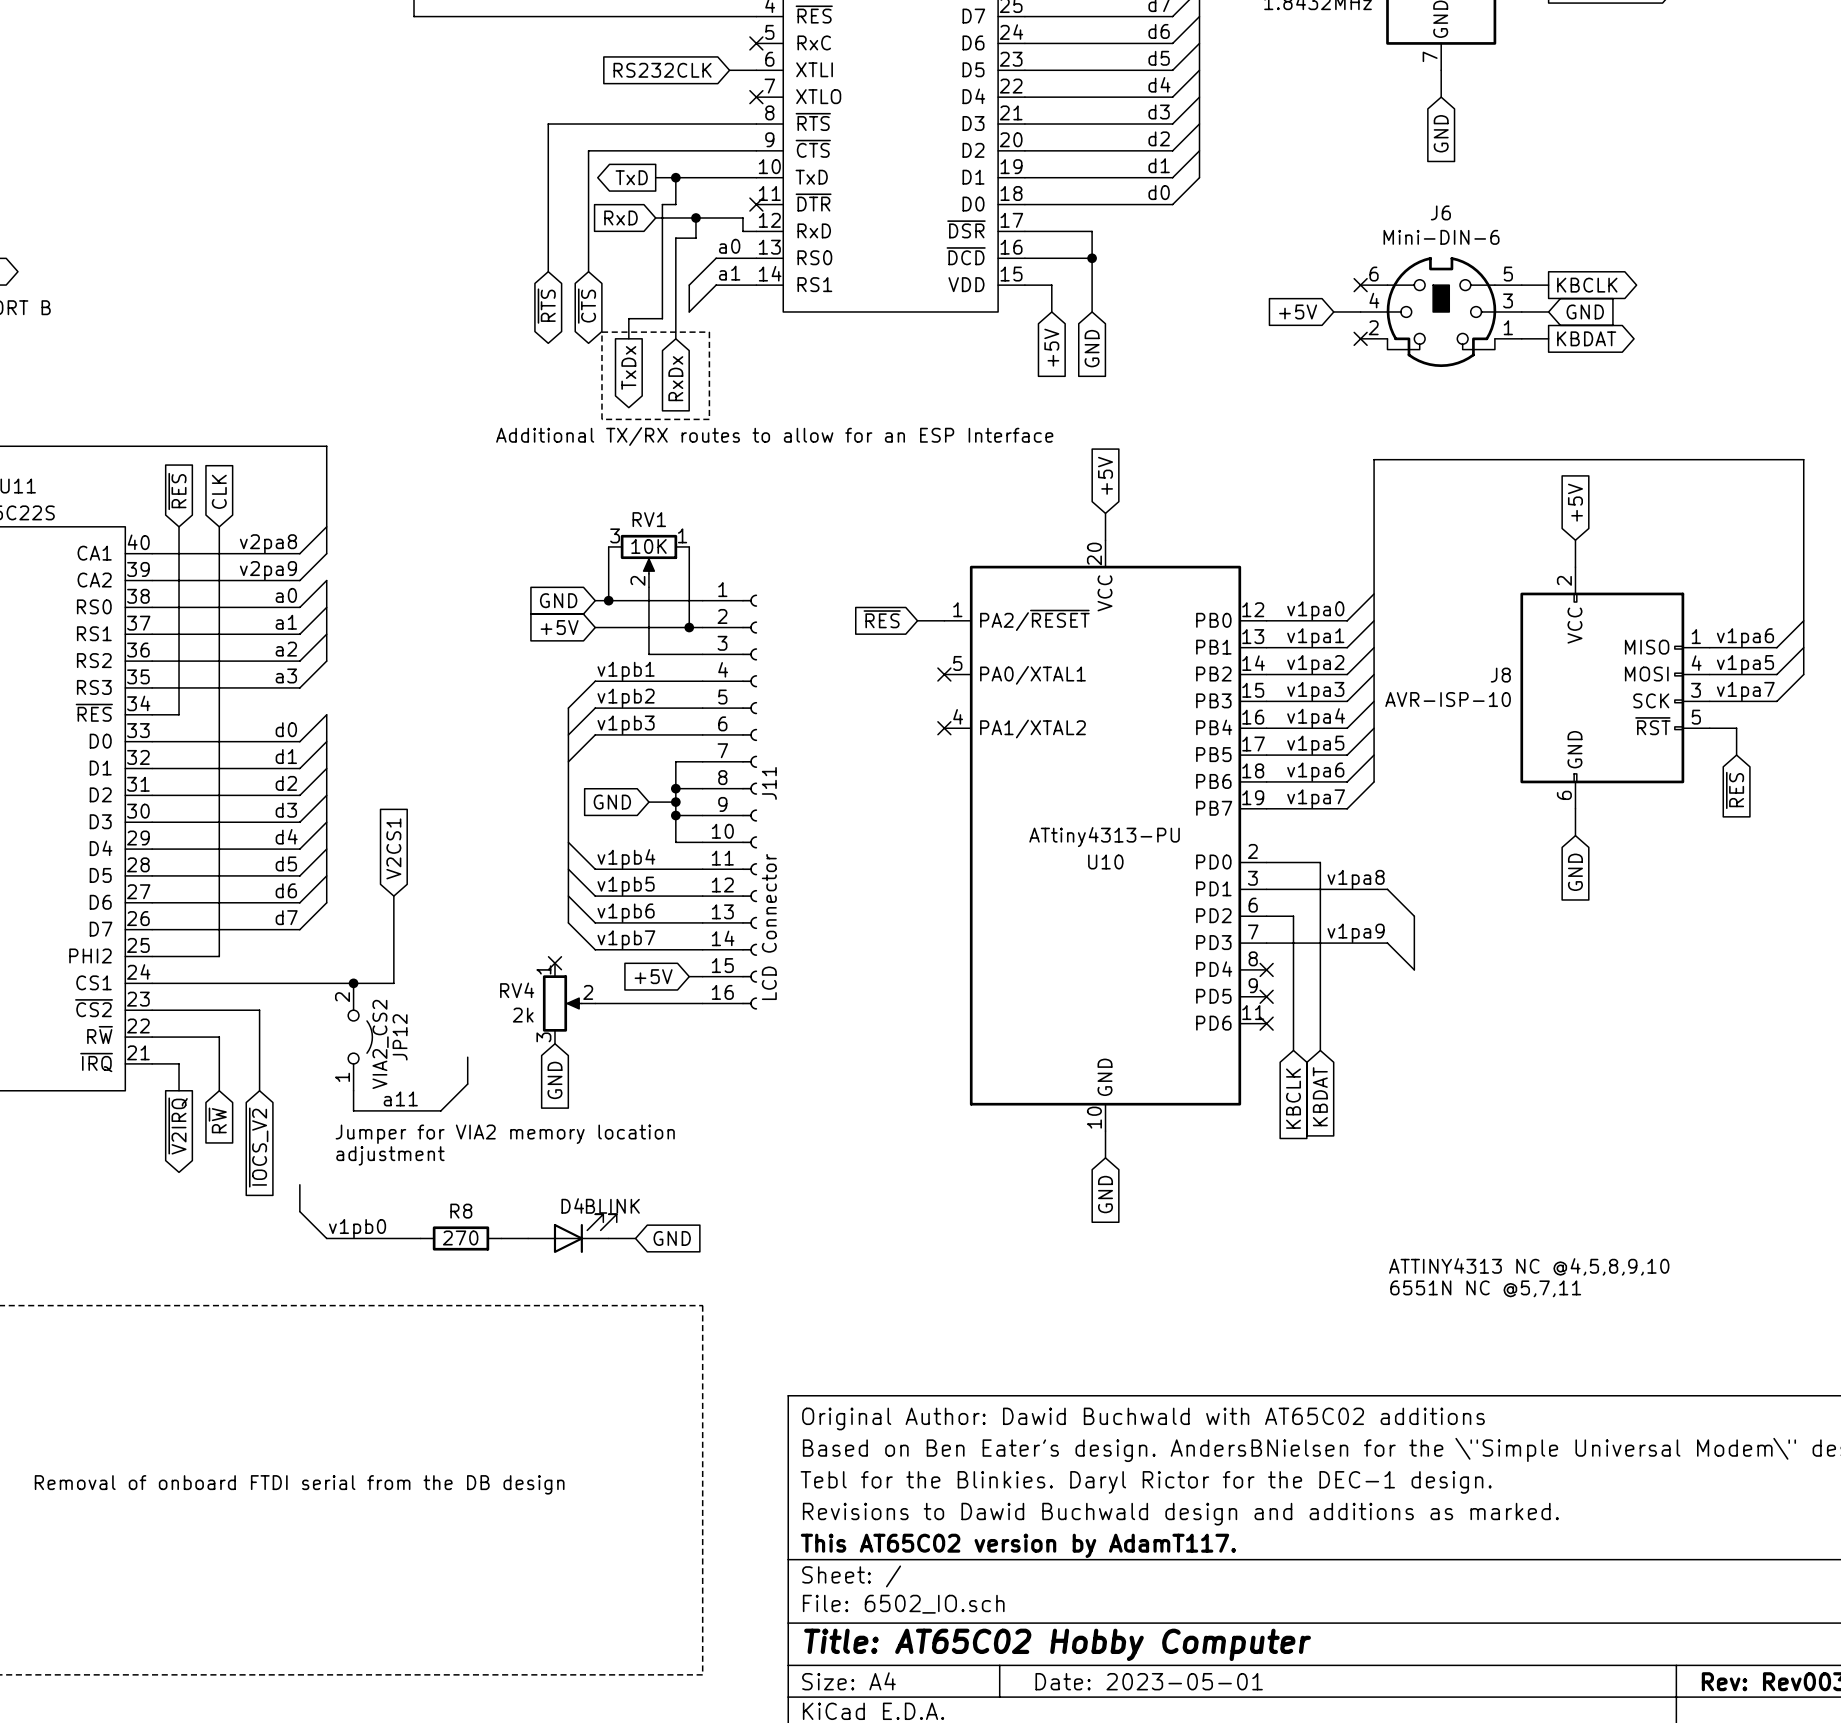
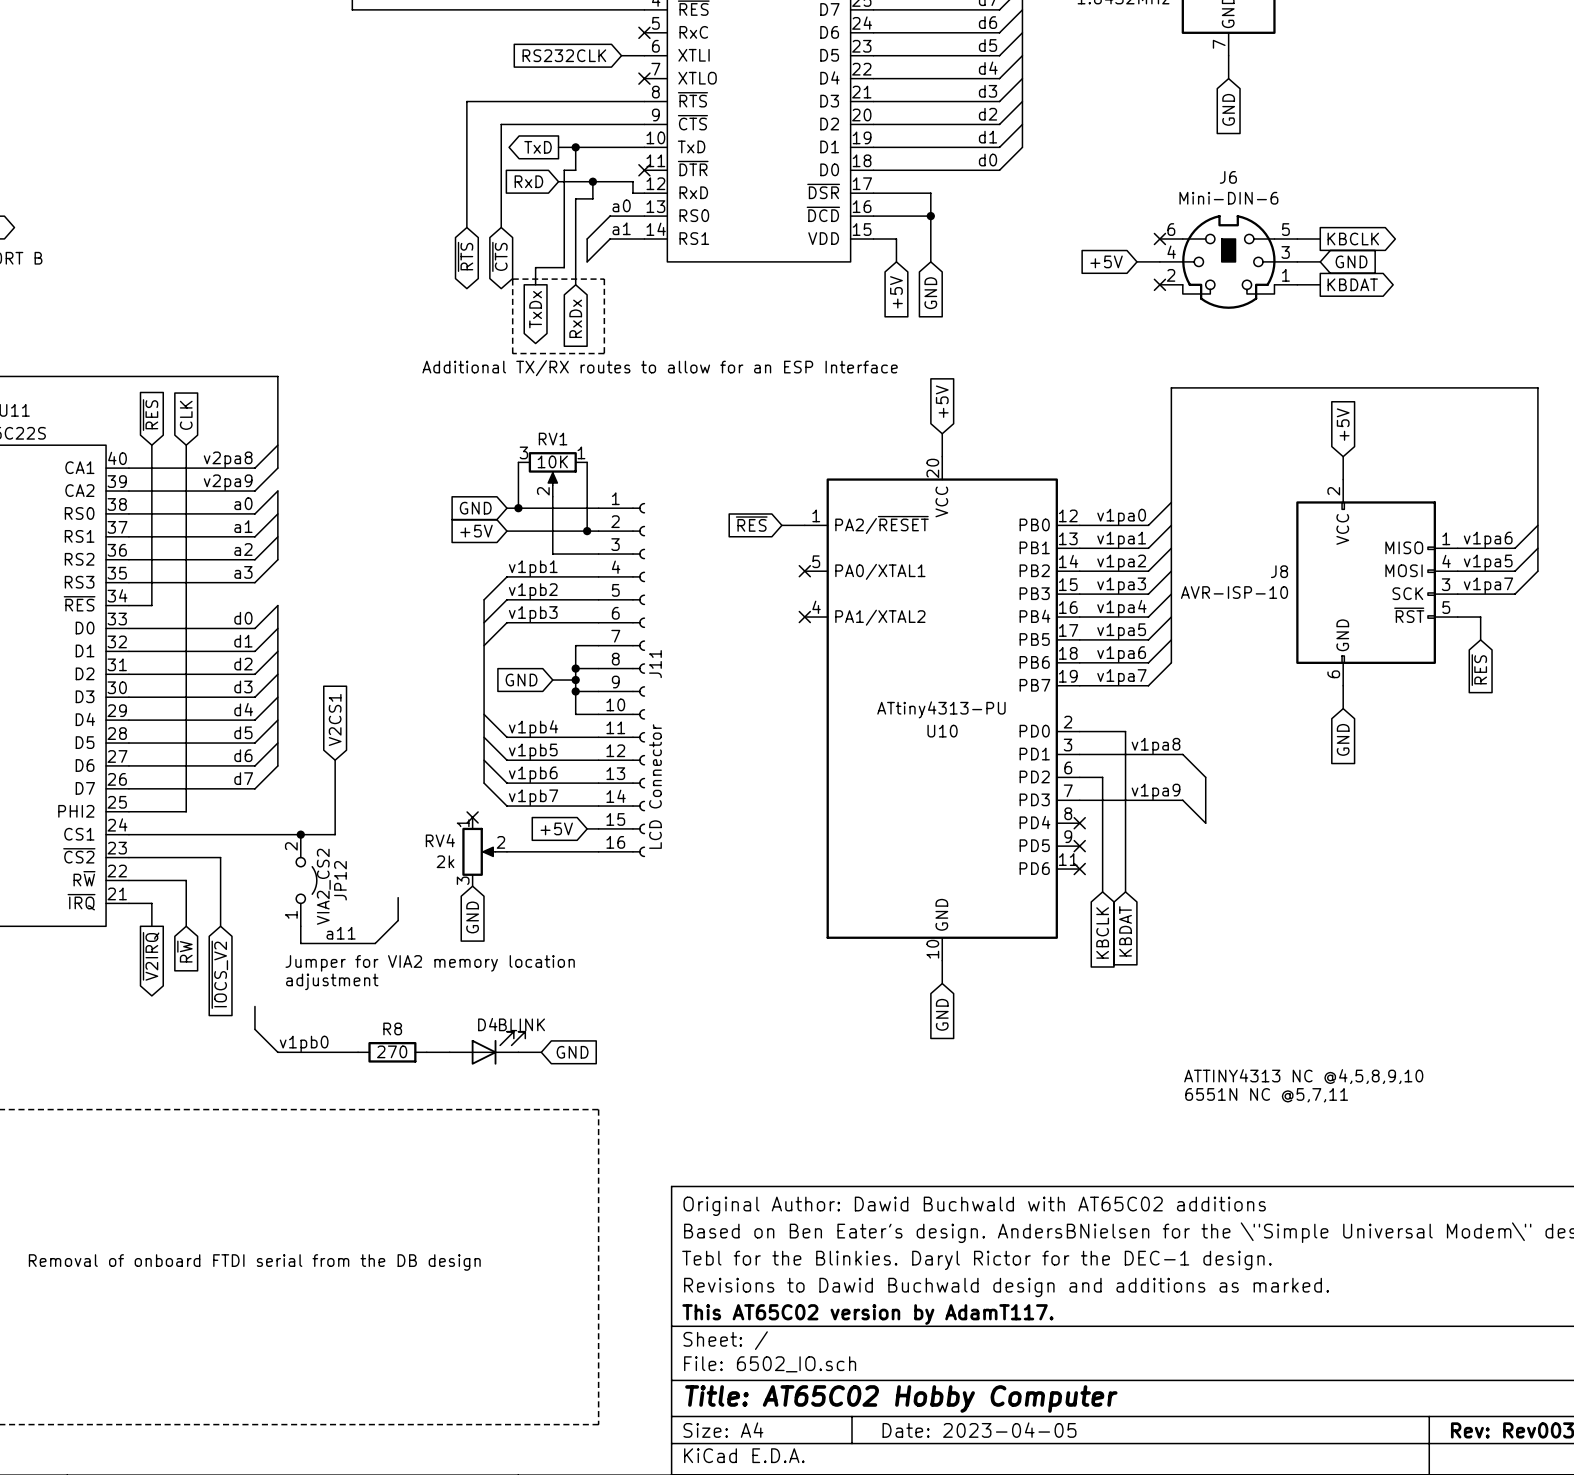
title block: Date: 2023-05-01 (1149, 1681) -> Date: 2023-04-05 (979, 1430)

